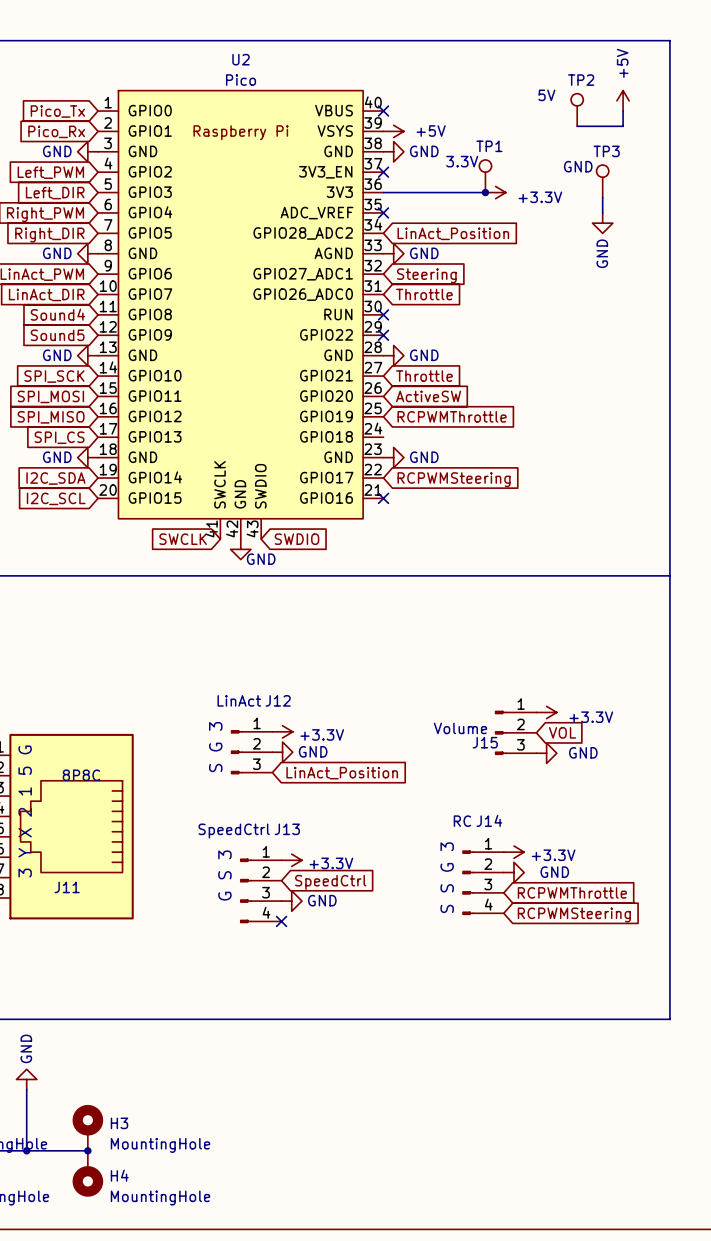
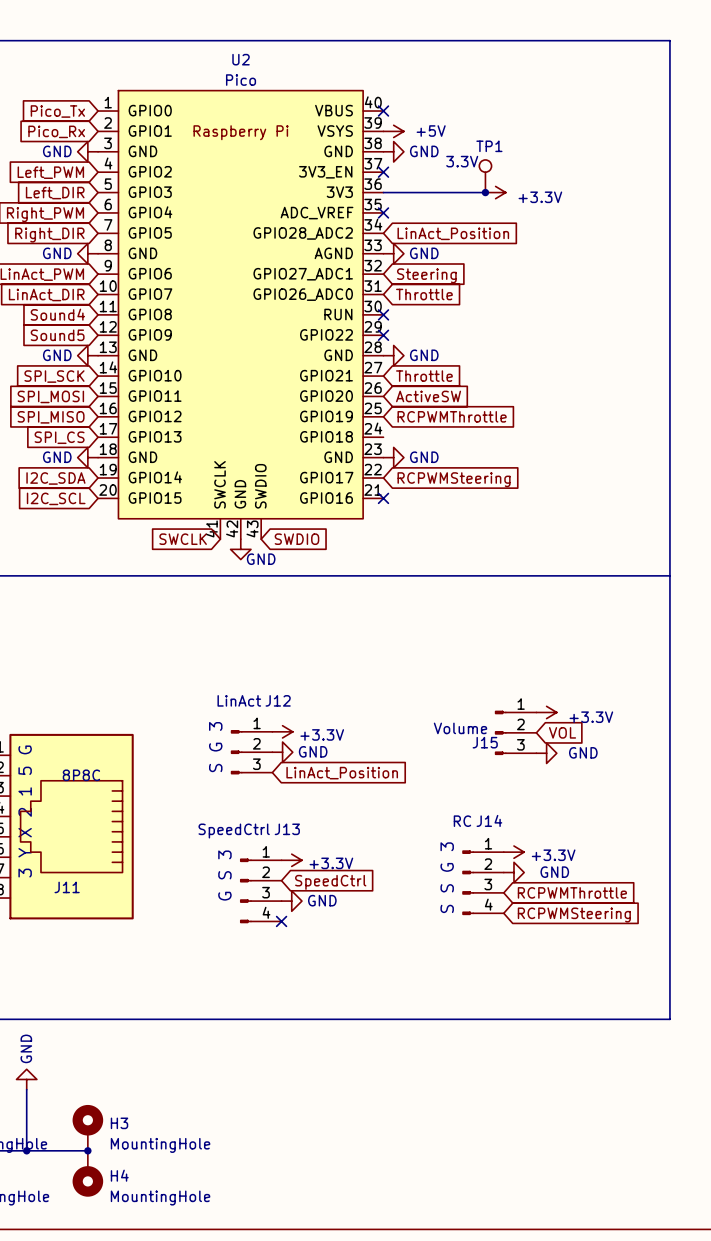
power symbol: +5V (623, 100) -> none
TP2: 5V (577, 109) -> none
wire: (623, 111) (623, 126) (577, 126) -> none
TP3: GND (602, 181) -> none
wire: (602, 197) (602, 212) -> none
power symbol: GND (602, 223) -> none

